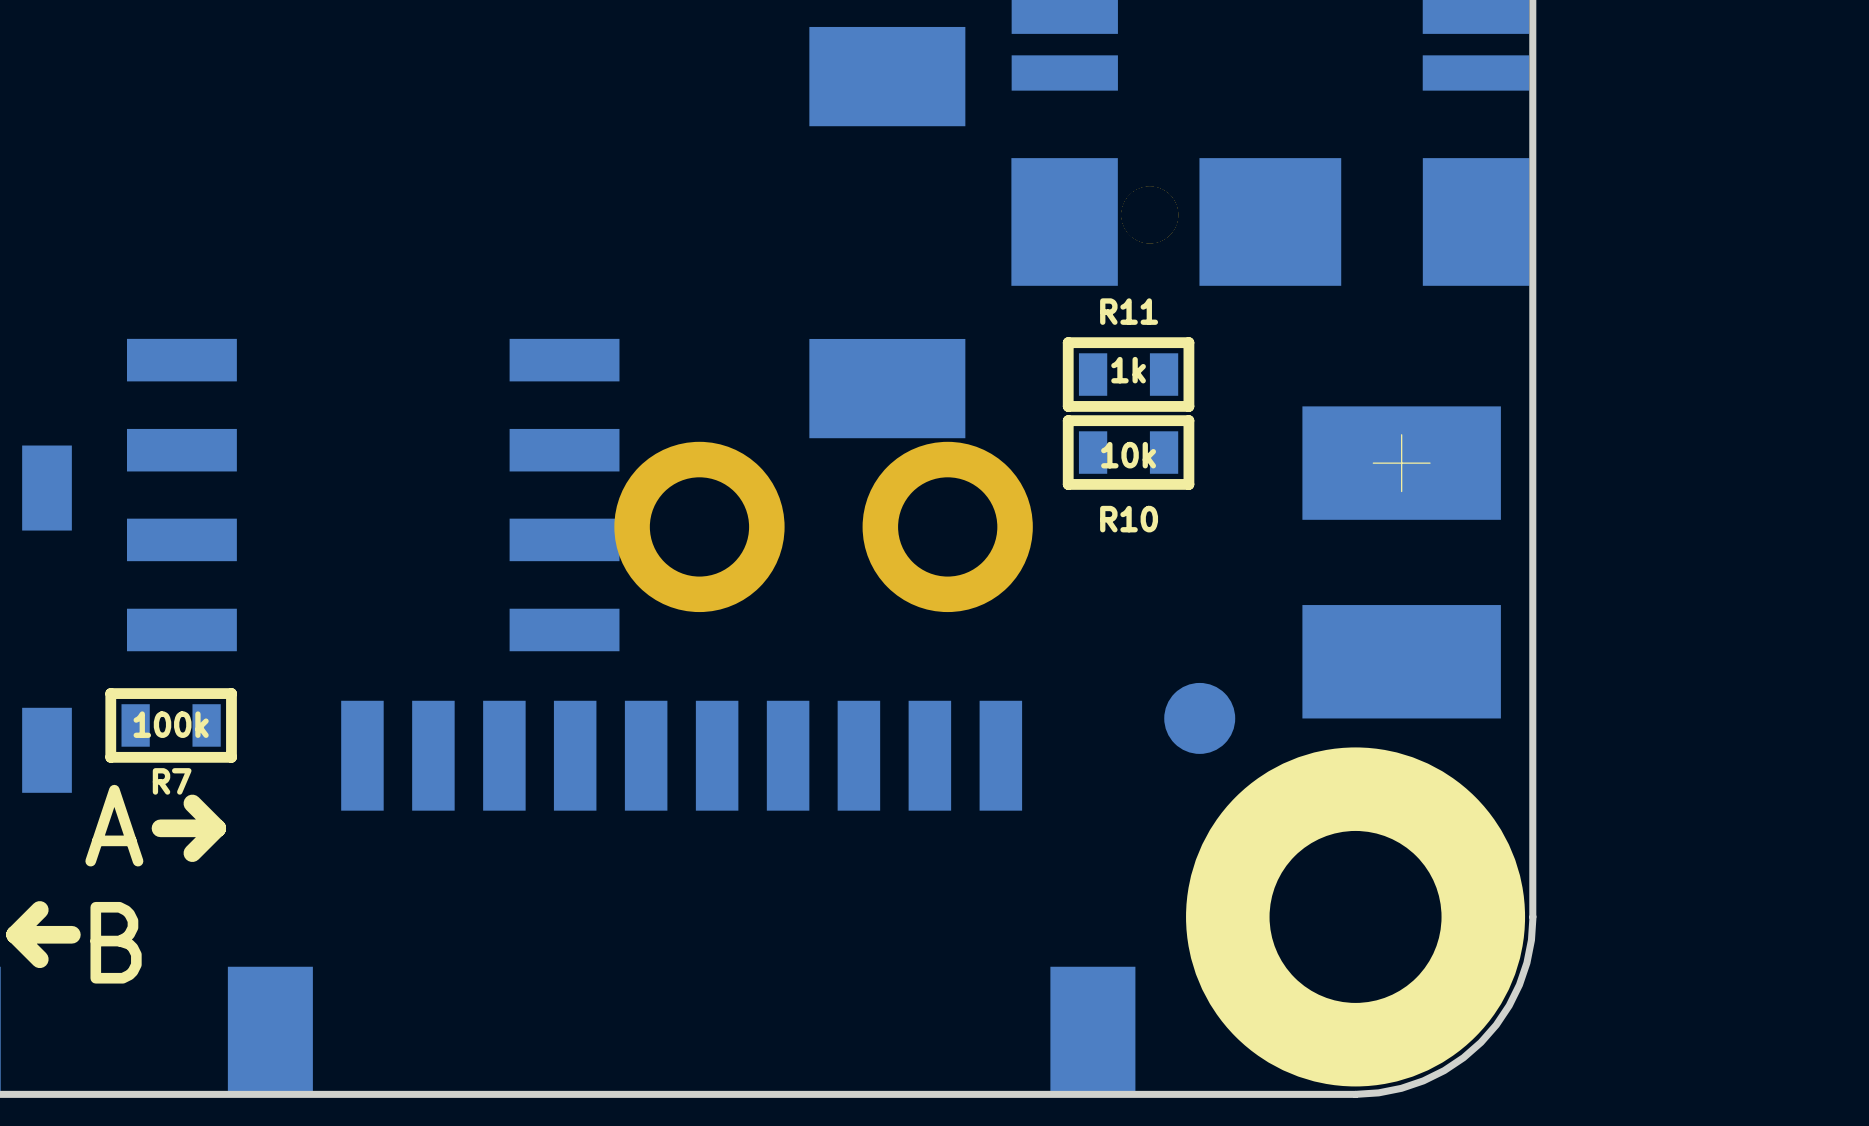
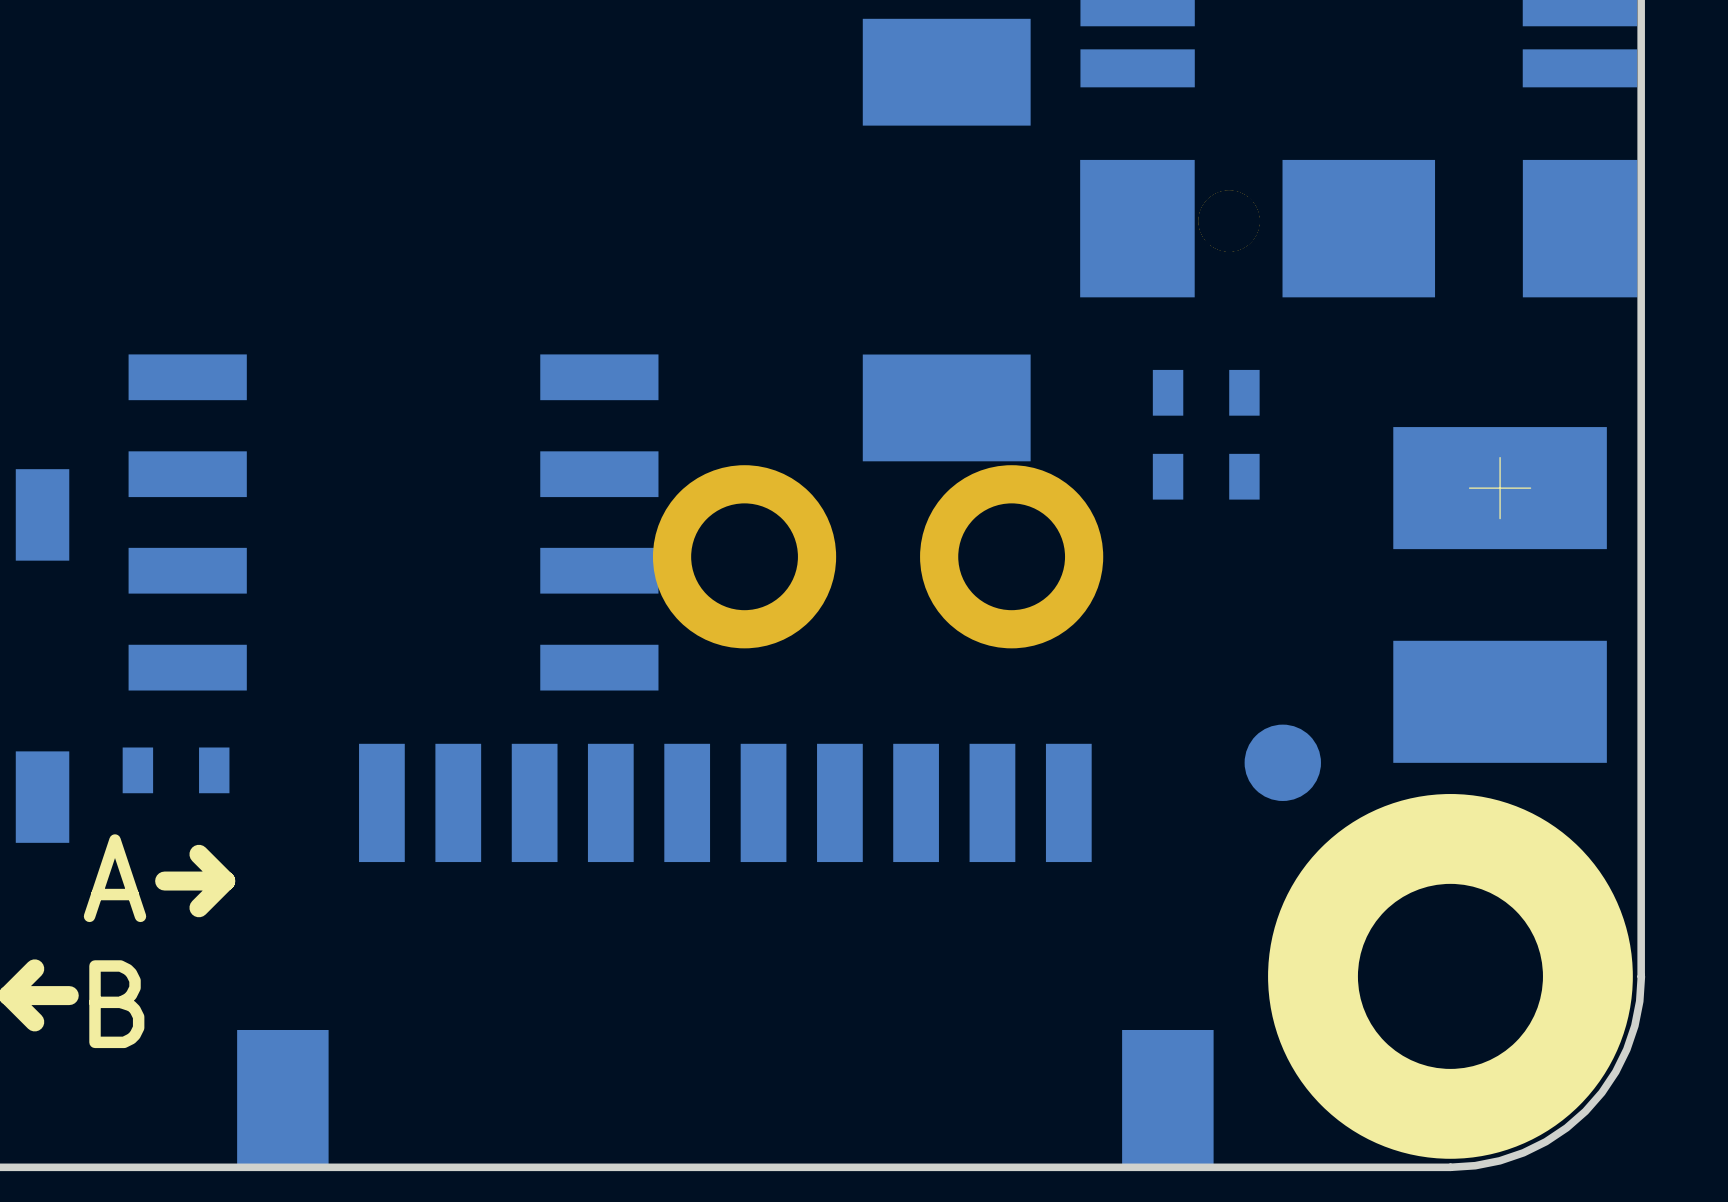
R11: 1k (1128, 374) -> none
R10: 10k (1128, 452) -> none
part: none -> (1206, 476)
R7: 100k (171, 725) -> none
part: none -> (176, 770)

